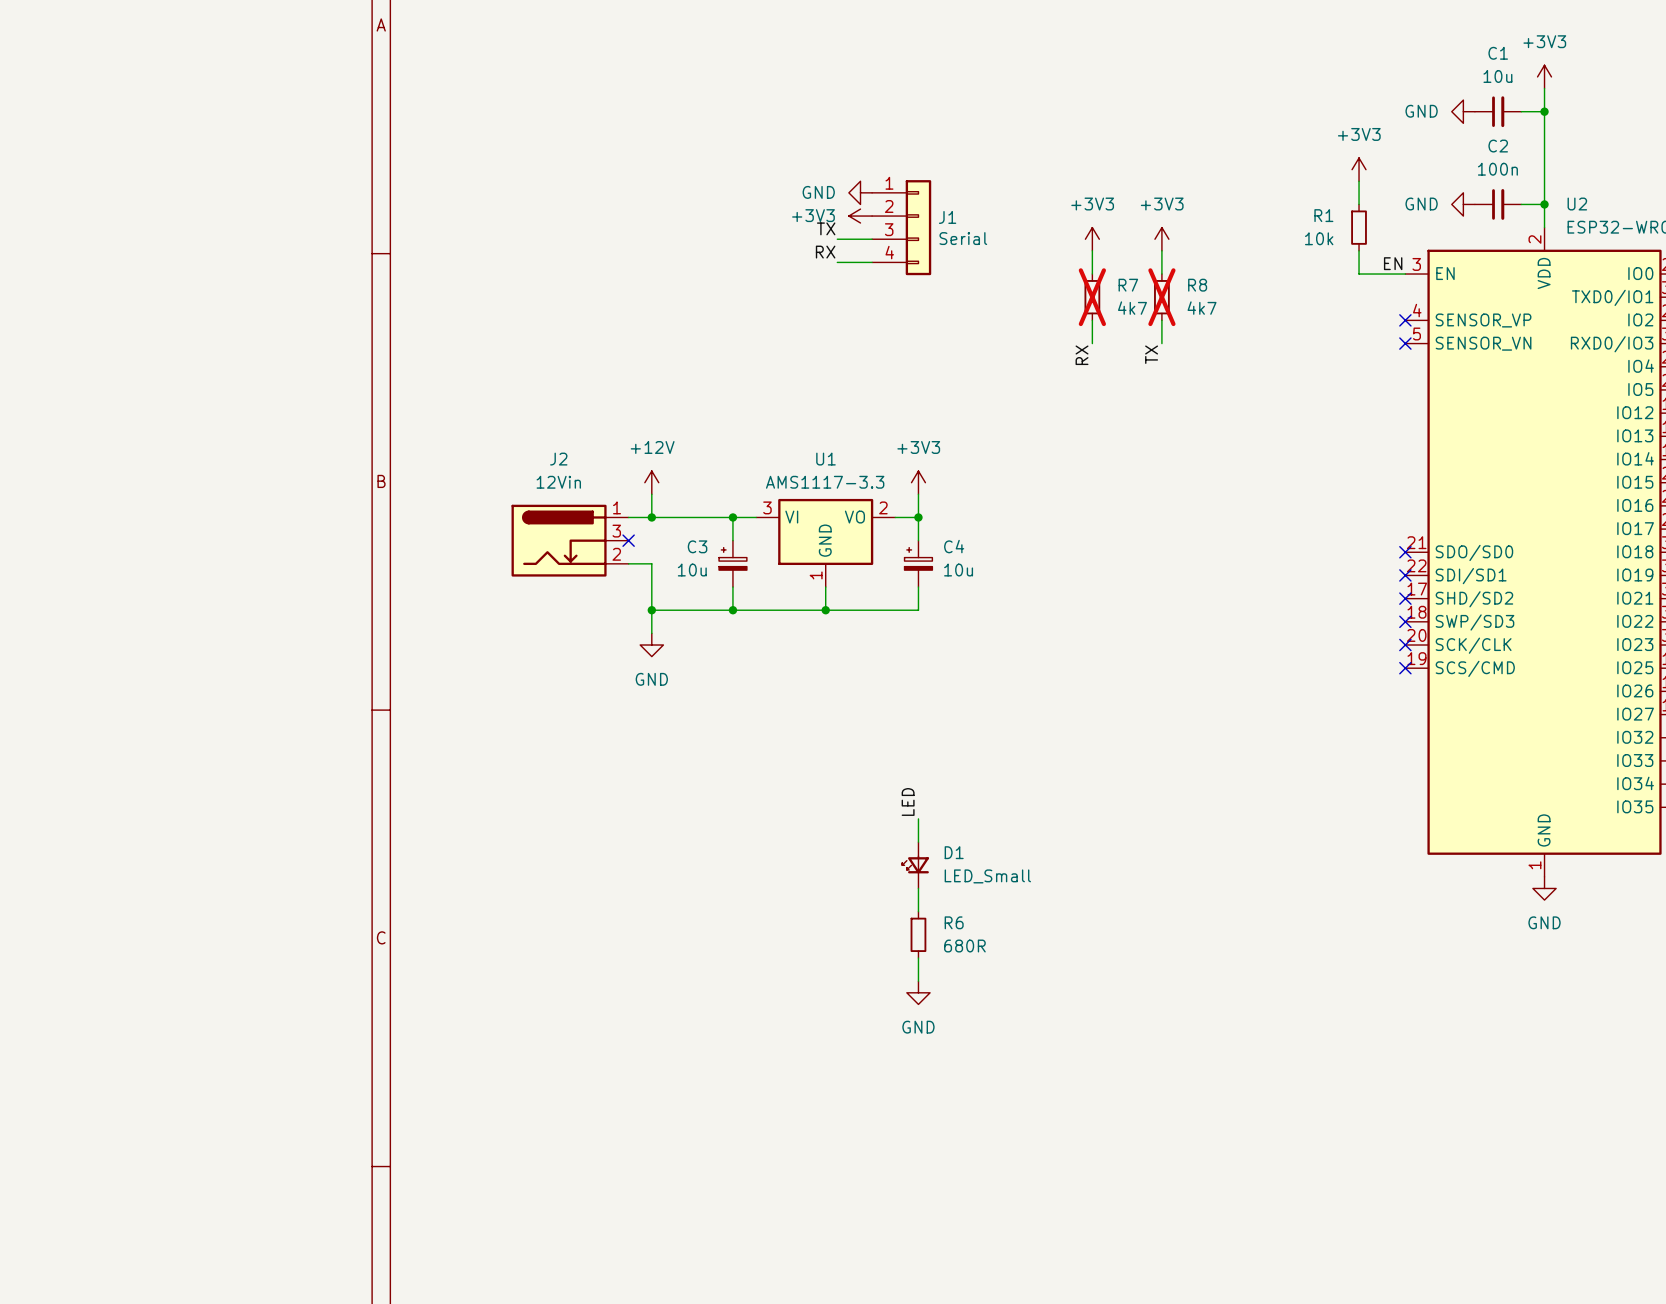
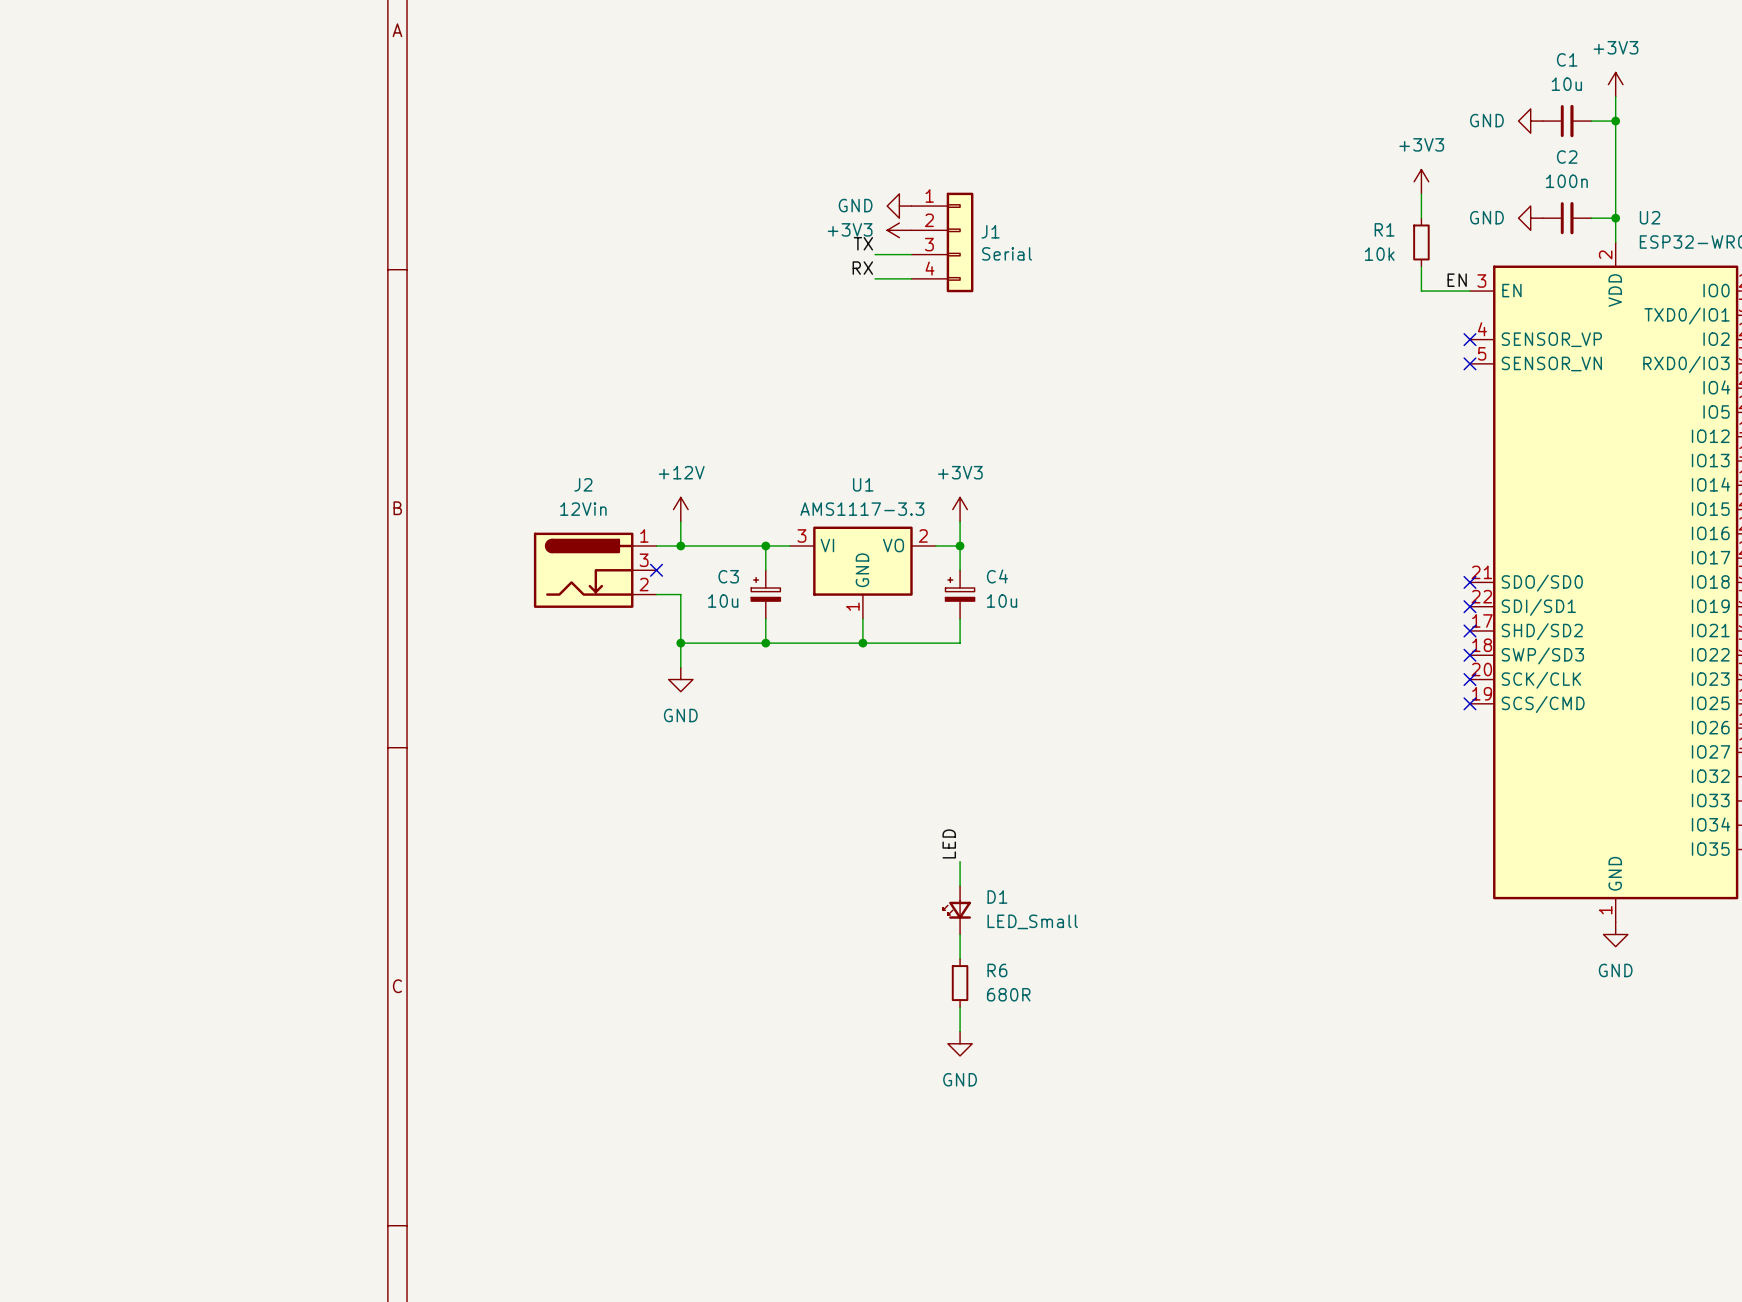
power symbol: +3V3 (1092, 239) -> none
power symbol: +3V3 (1161, 239) -> none
wire: (1092, 250) (1092, 274) -> none
wire: (1161, 250) (1161, 274) -> none
R7: 4k7 (1092, 297) -> none
R8: 4k7 (1161, 297) -> none
wire: (1092, 320) (1092, 343) -> none
wire: (1161, 320) (1161, 343) -> none
label: TX (1151, 354) -> none
label: RX (1082, 355) -> none

